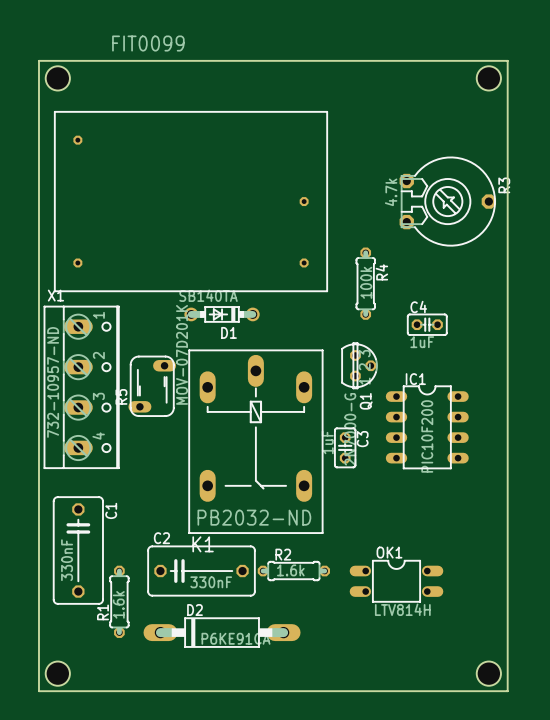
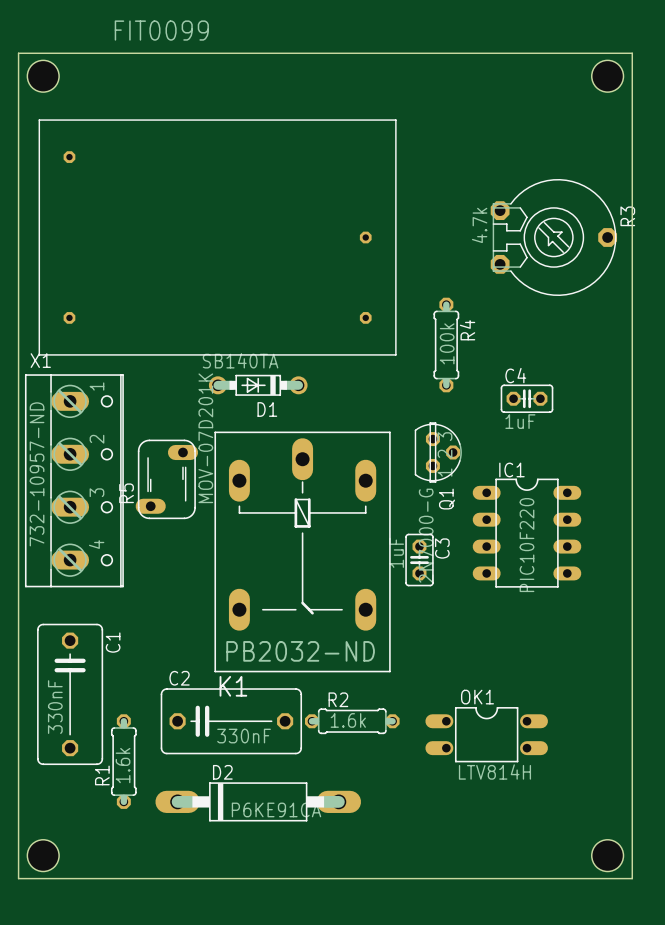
IC1 value: PIC10F200 (427, 436) -> PIC10F220 (526, 545)

